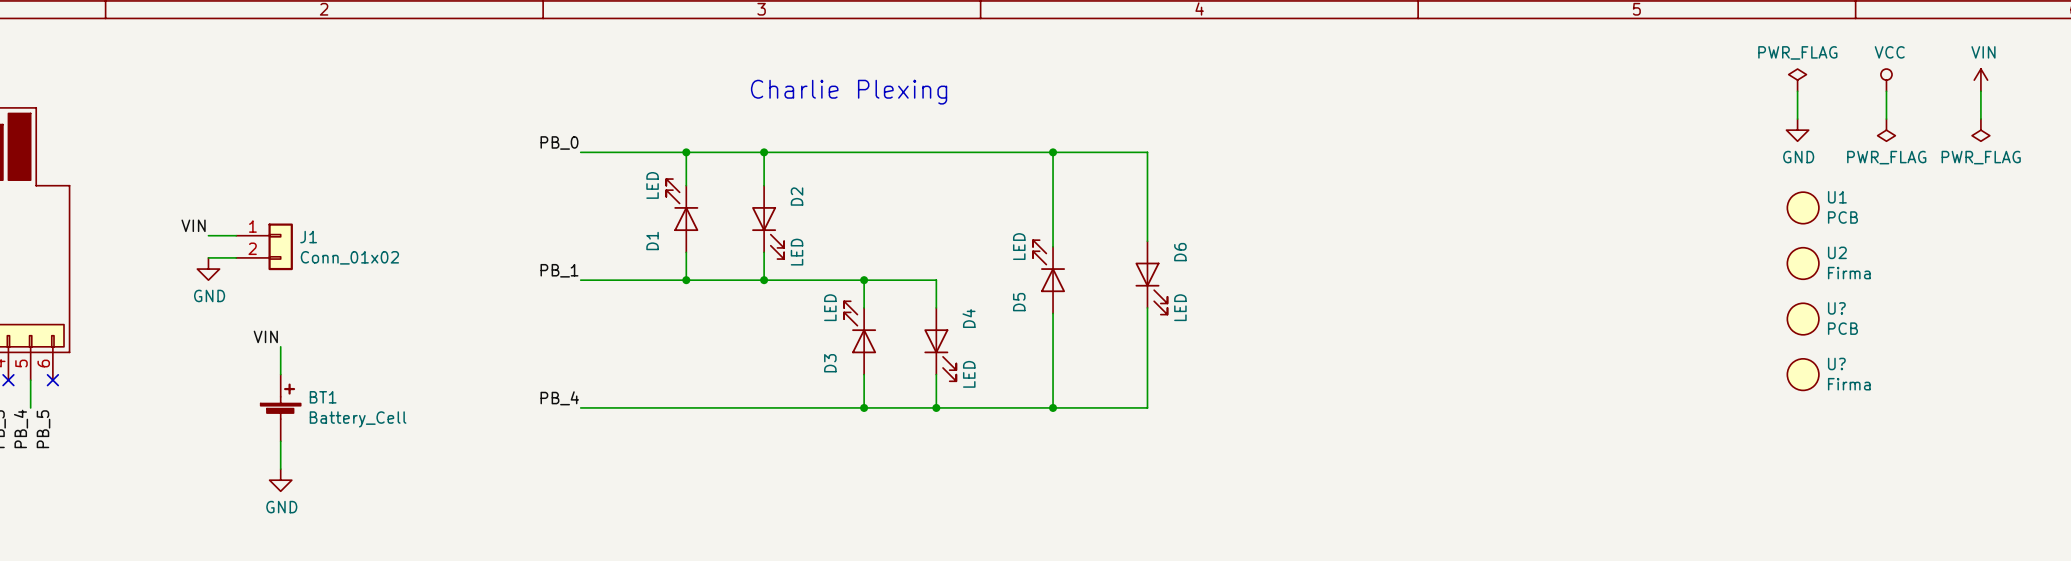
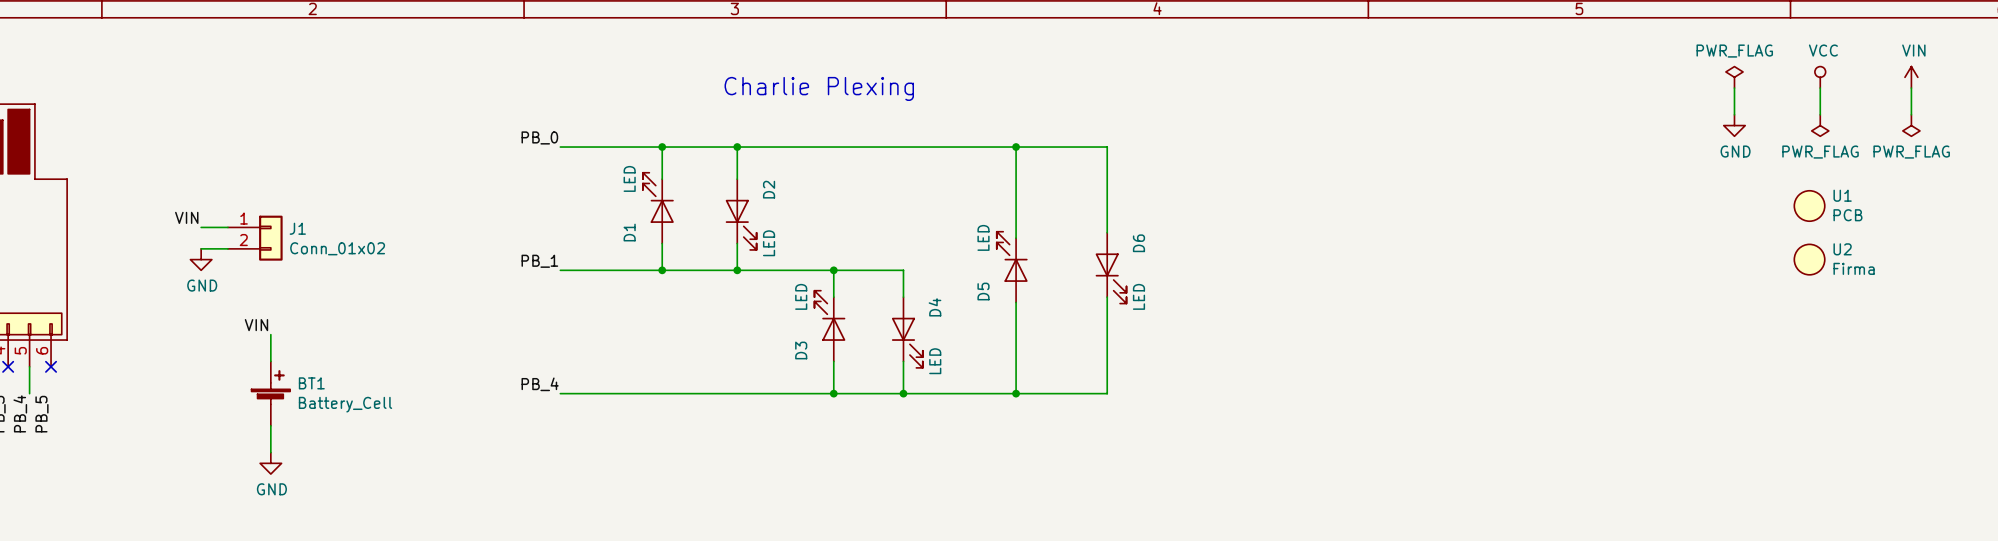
U1 position: (1803, 207) -> (1809, 205)
U2 position: (1803, 263) -> (1809, 259)
U?: PCB (1803, 319) -> none
U?: Firma (1803, 374) -> none

